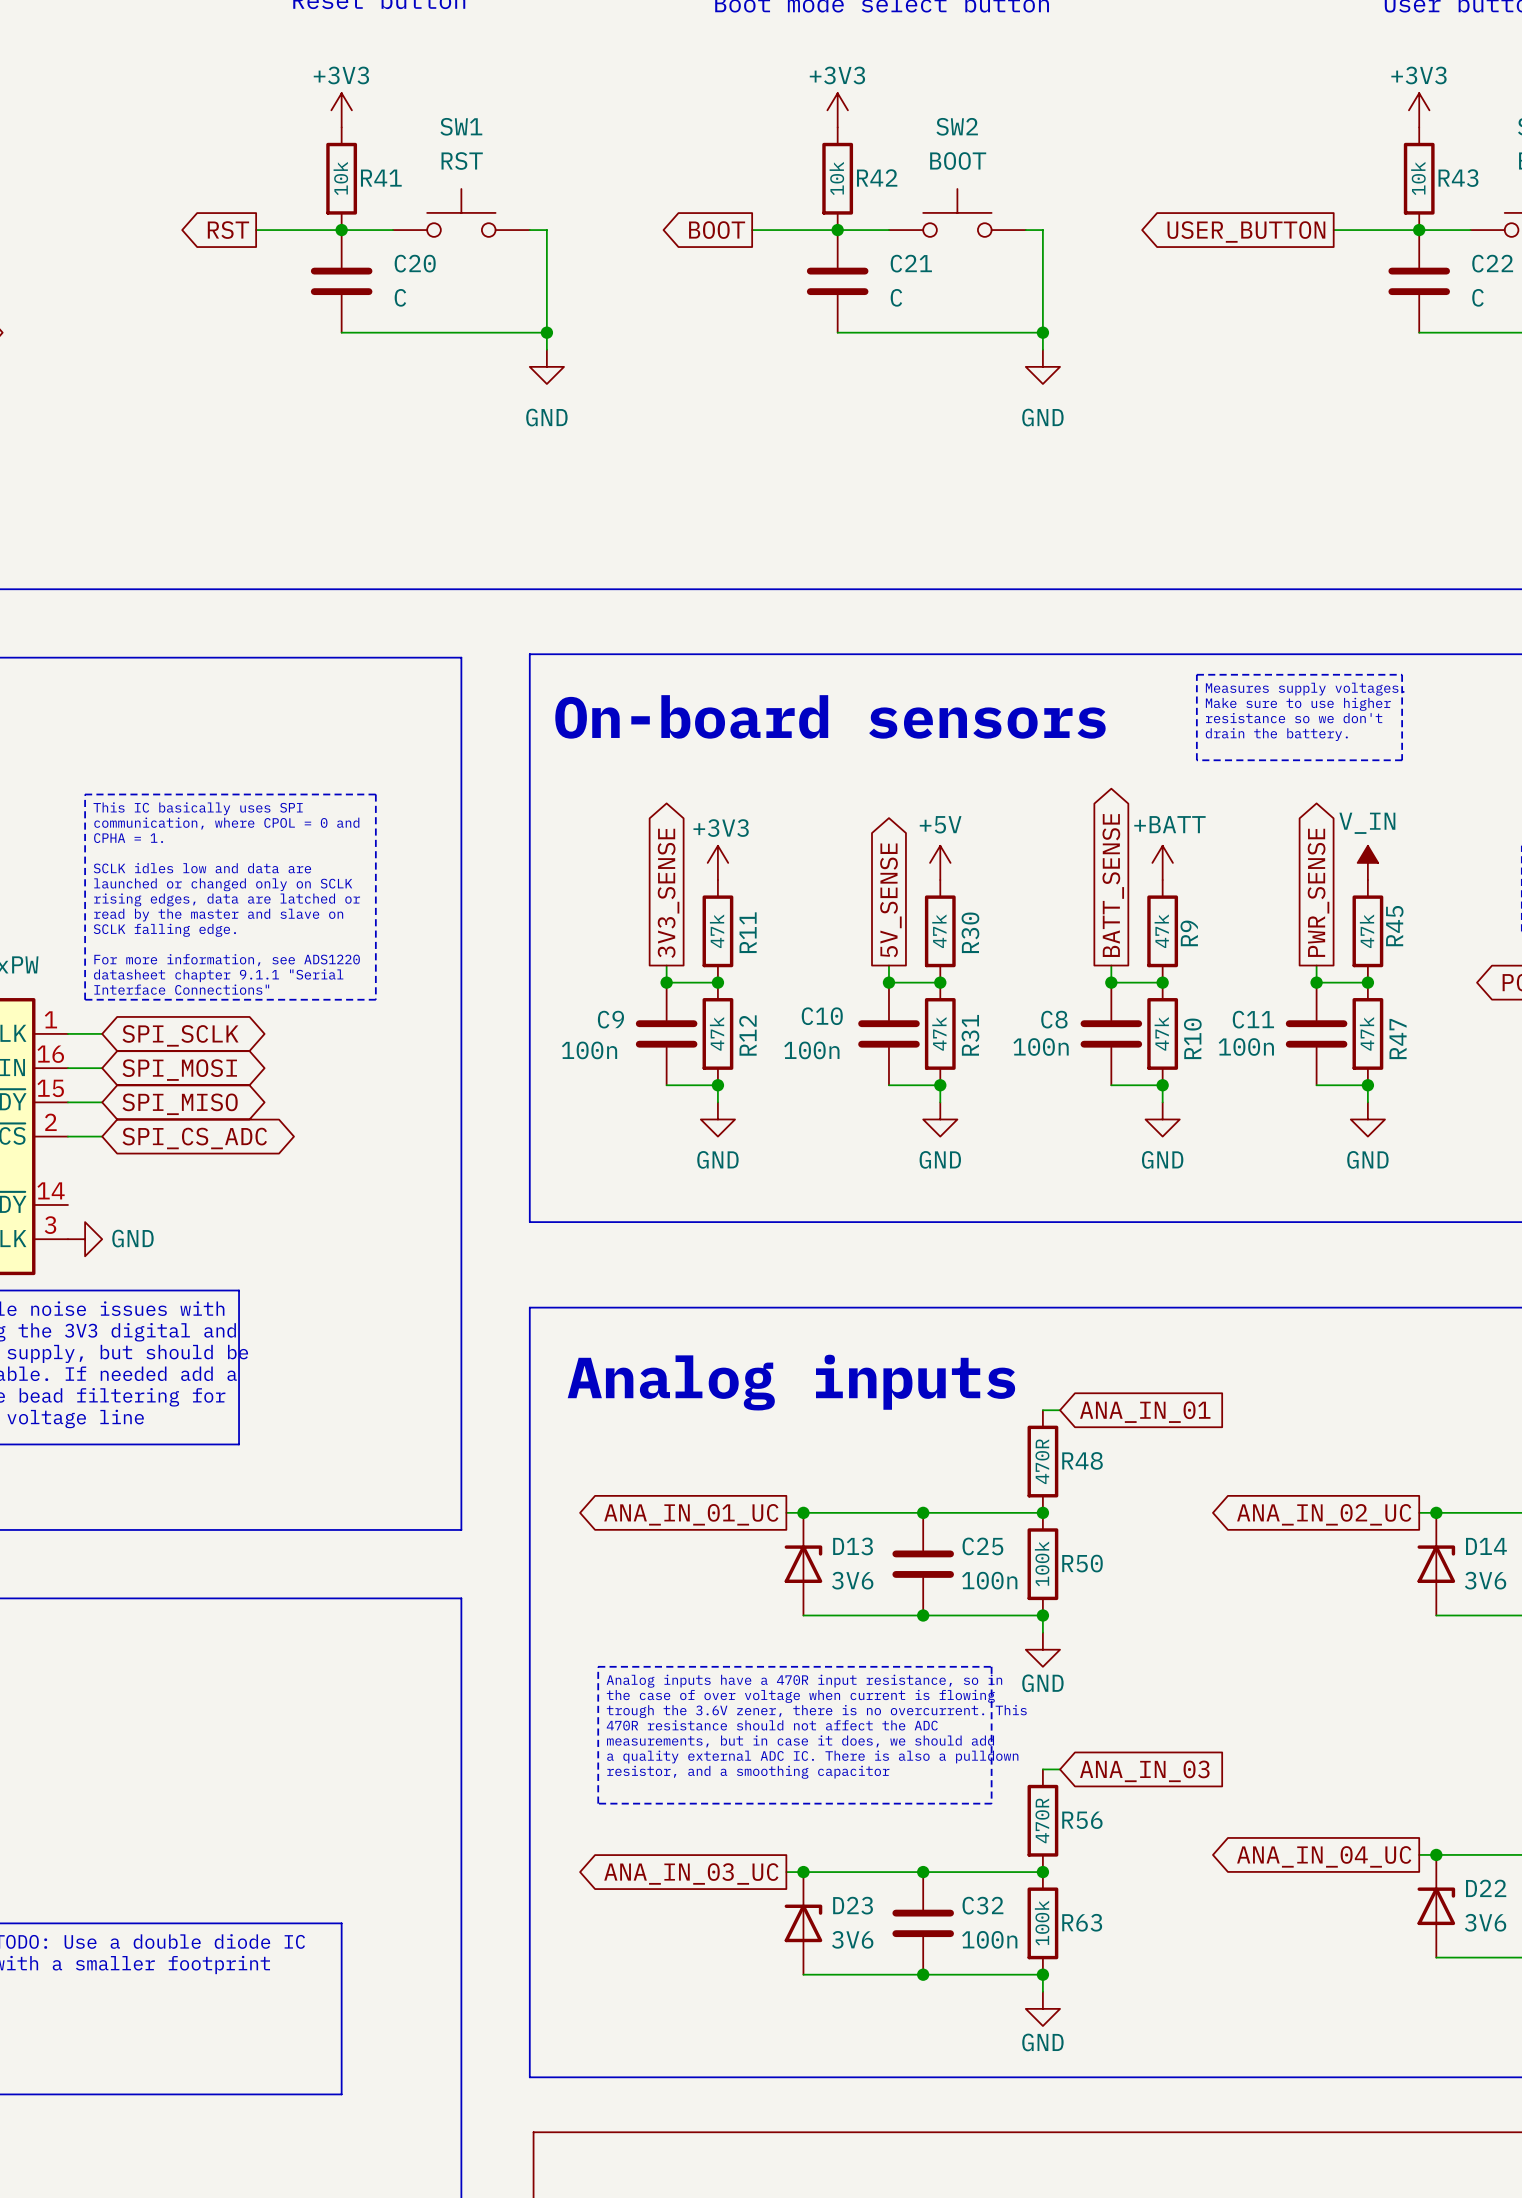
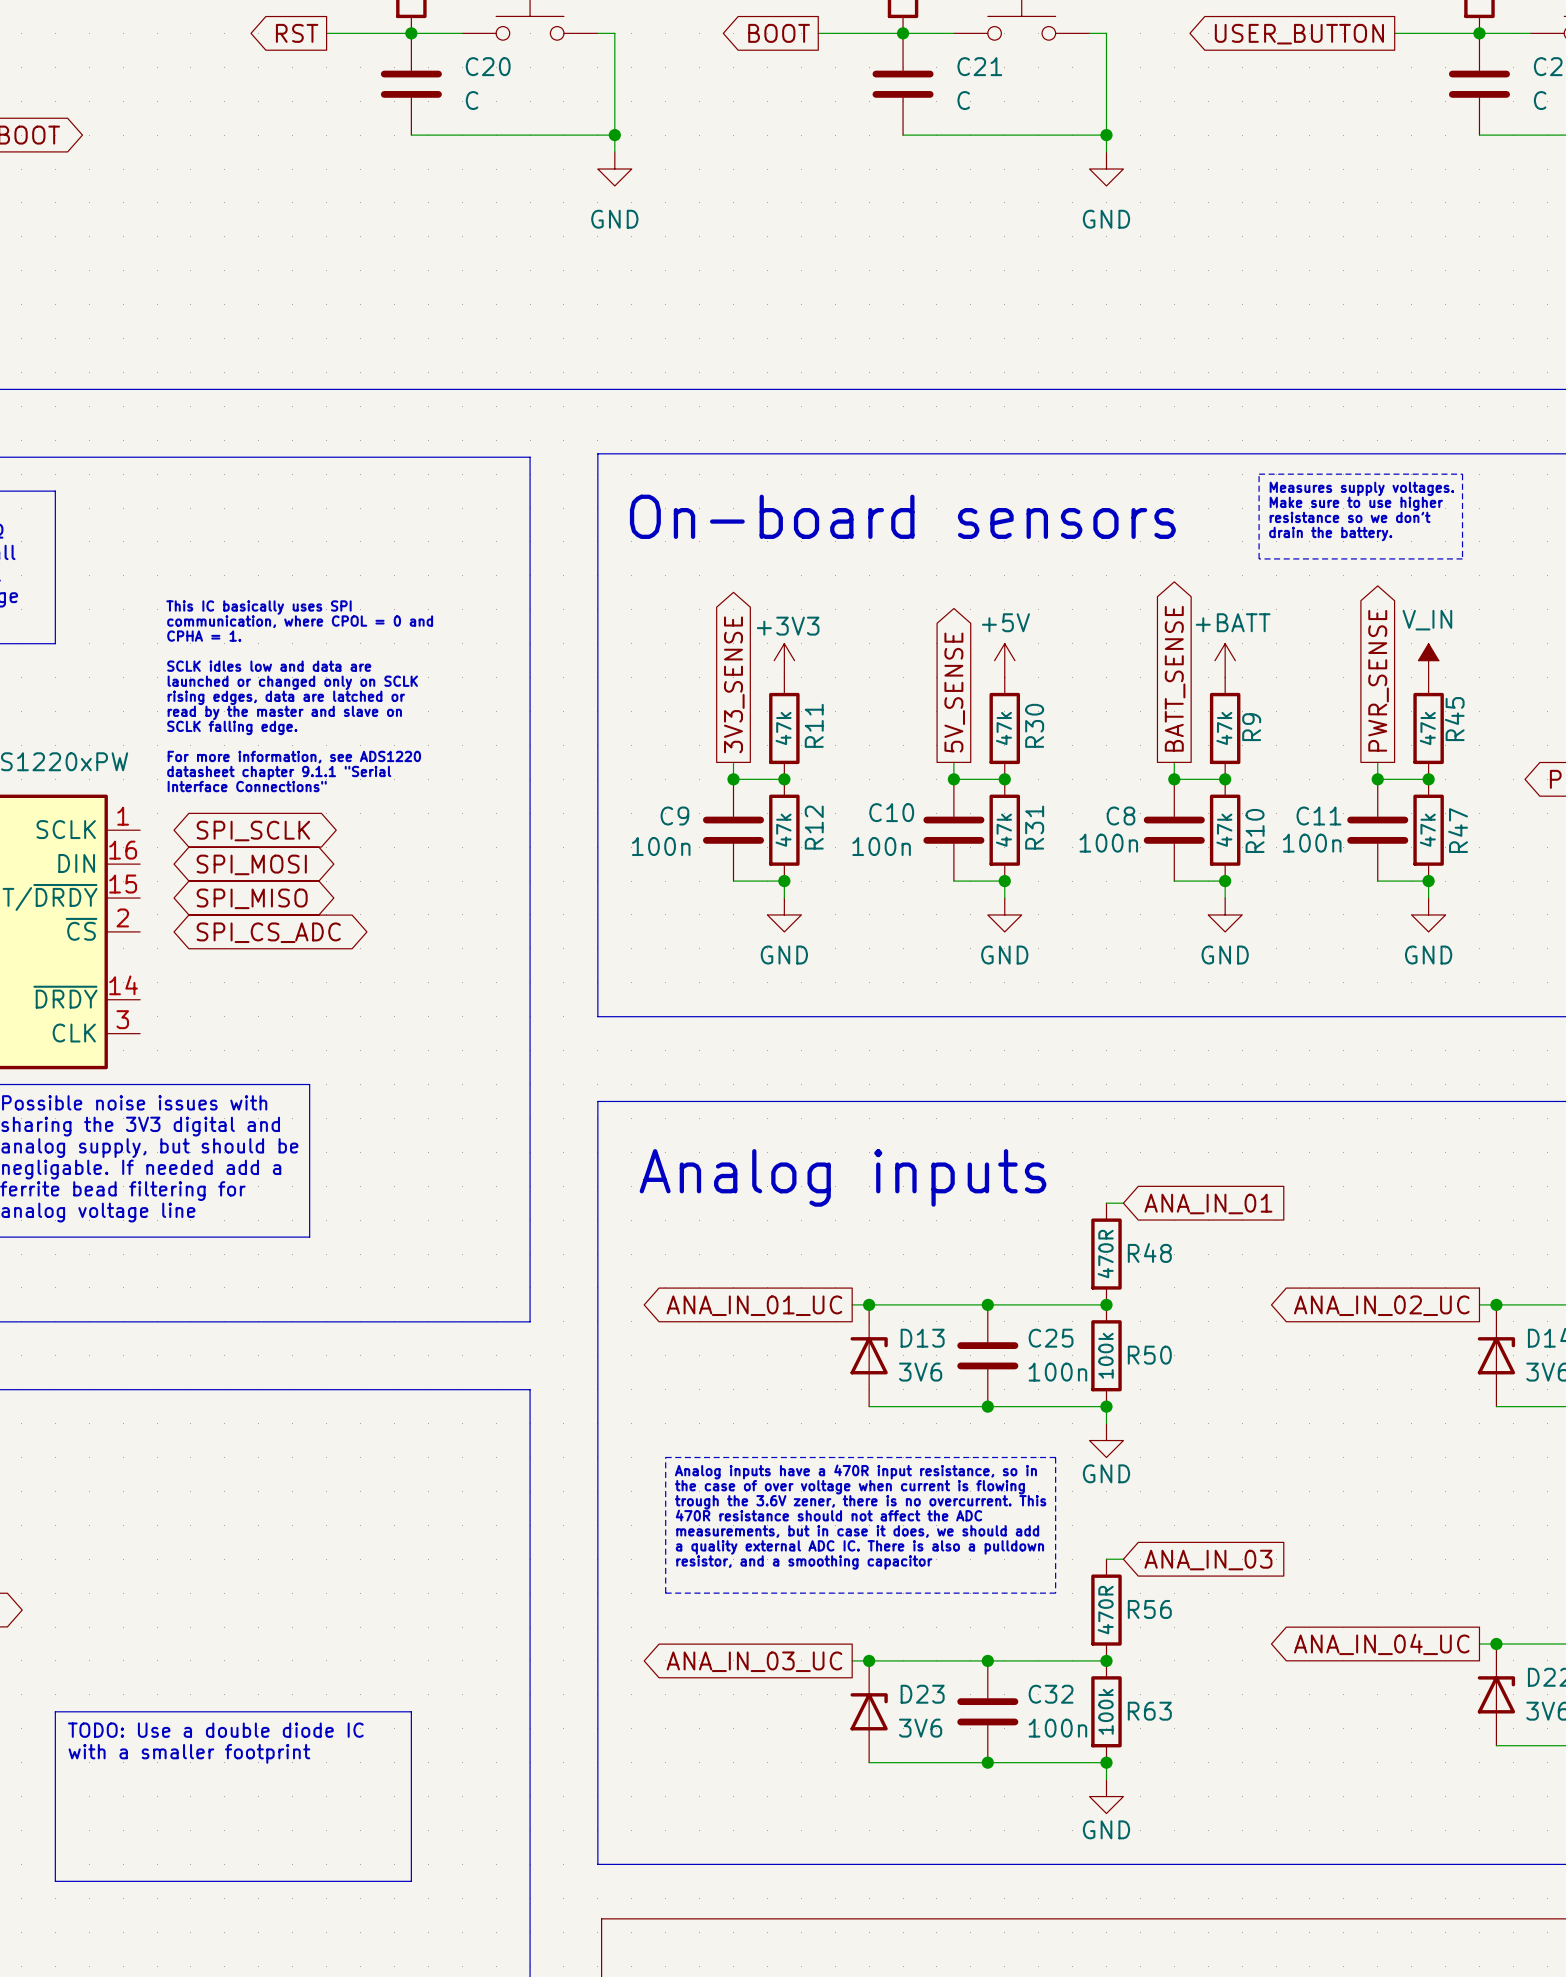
line: (85, 794) (375, 794) (375, 999) (85, 999) (85, 794) -> none
wire: (67, 1033) (102, 1033) -> none
wire: (67, 1068) (102, 1068) -> none
wire: (67, 1102) (102, 1102) -> none
wire: (67, 1136) (102, 1136) -> none
power symbol: GND (85, 1239) -> none

